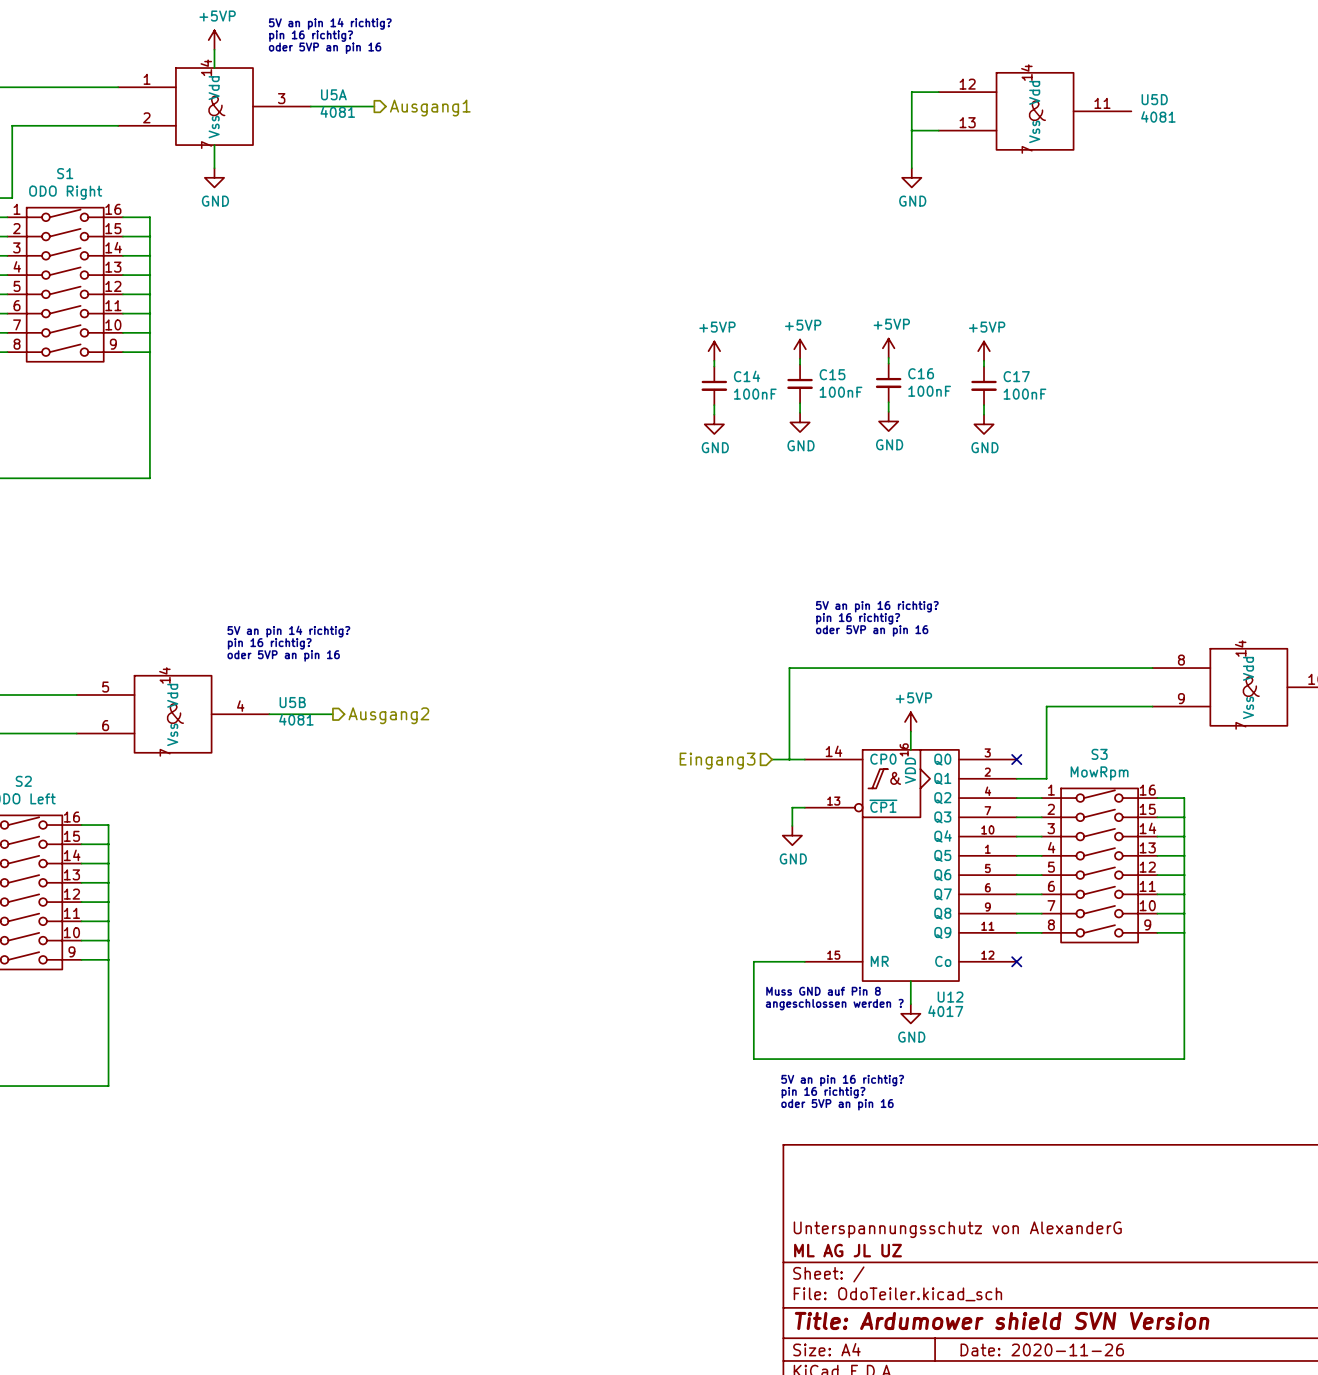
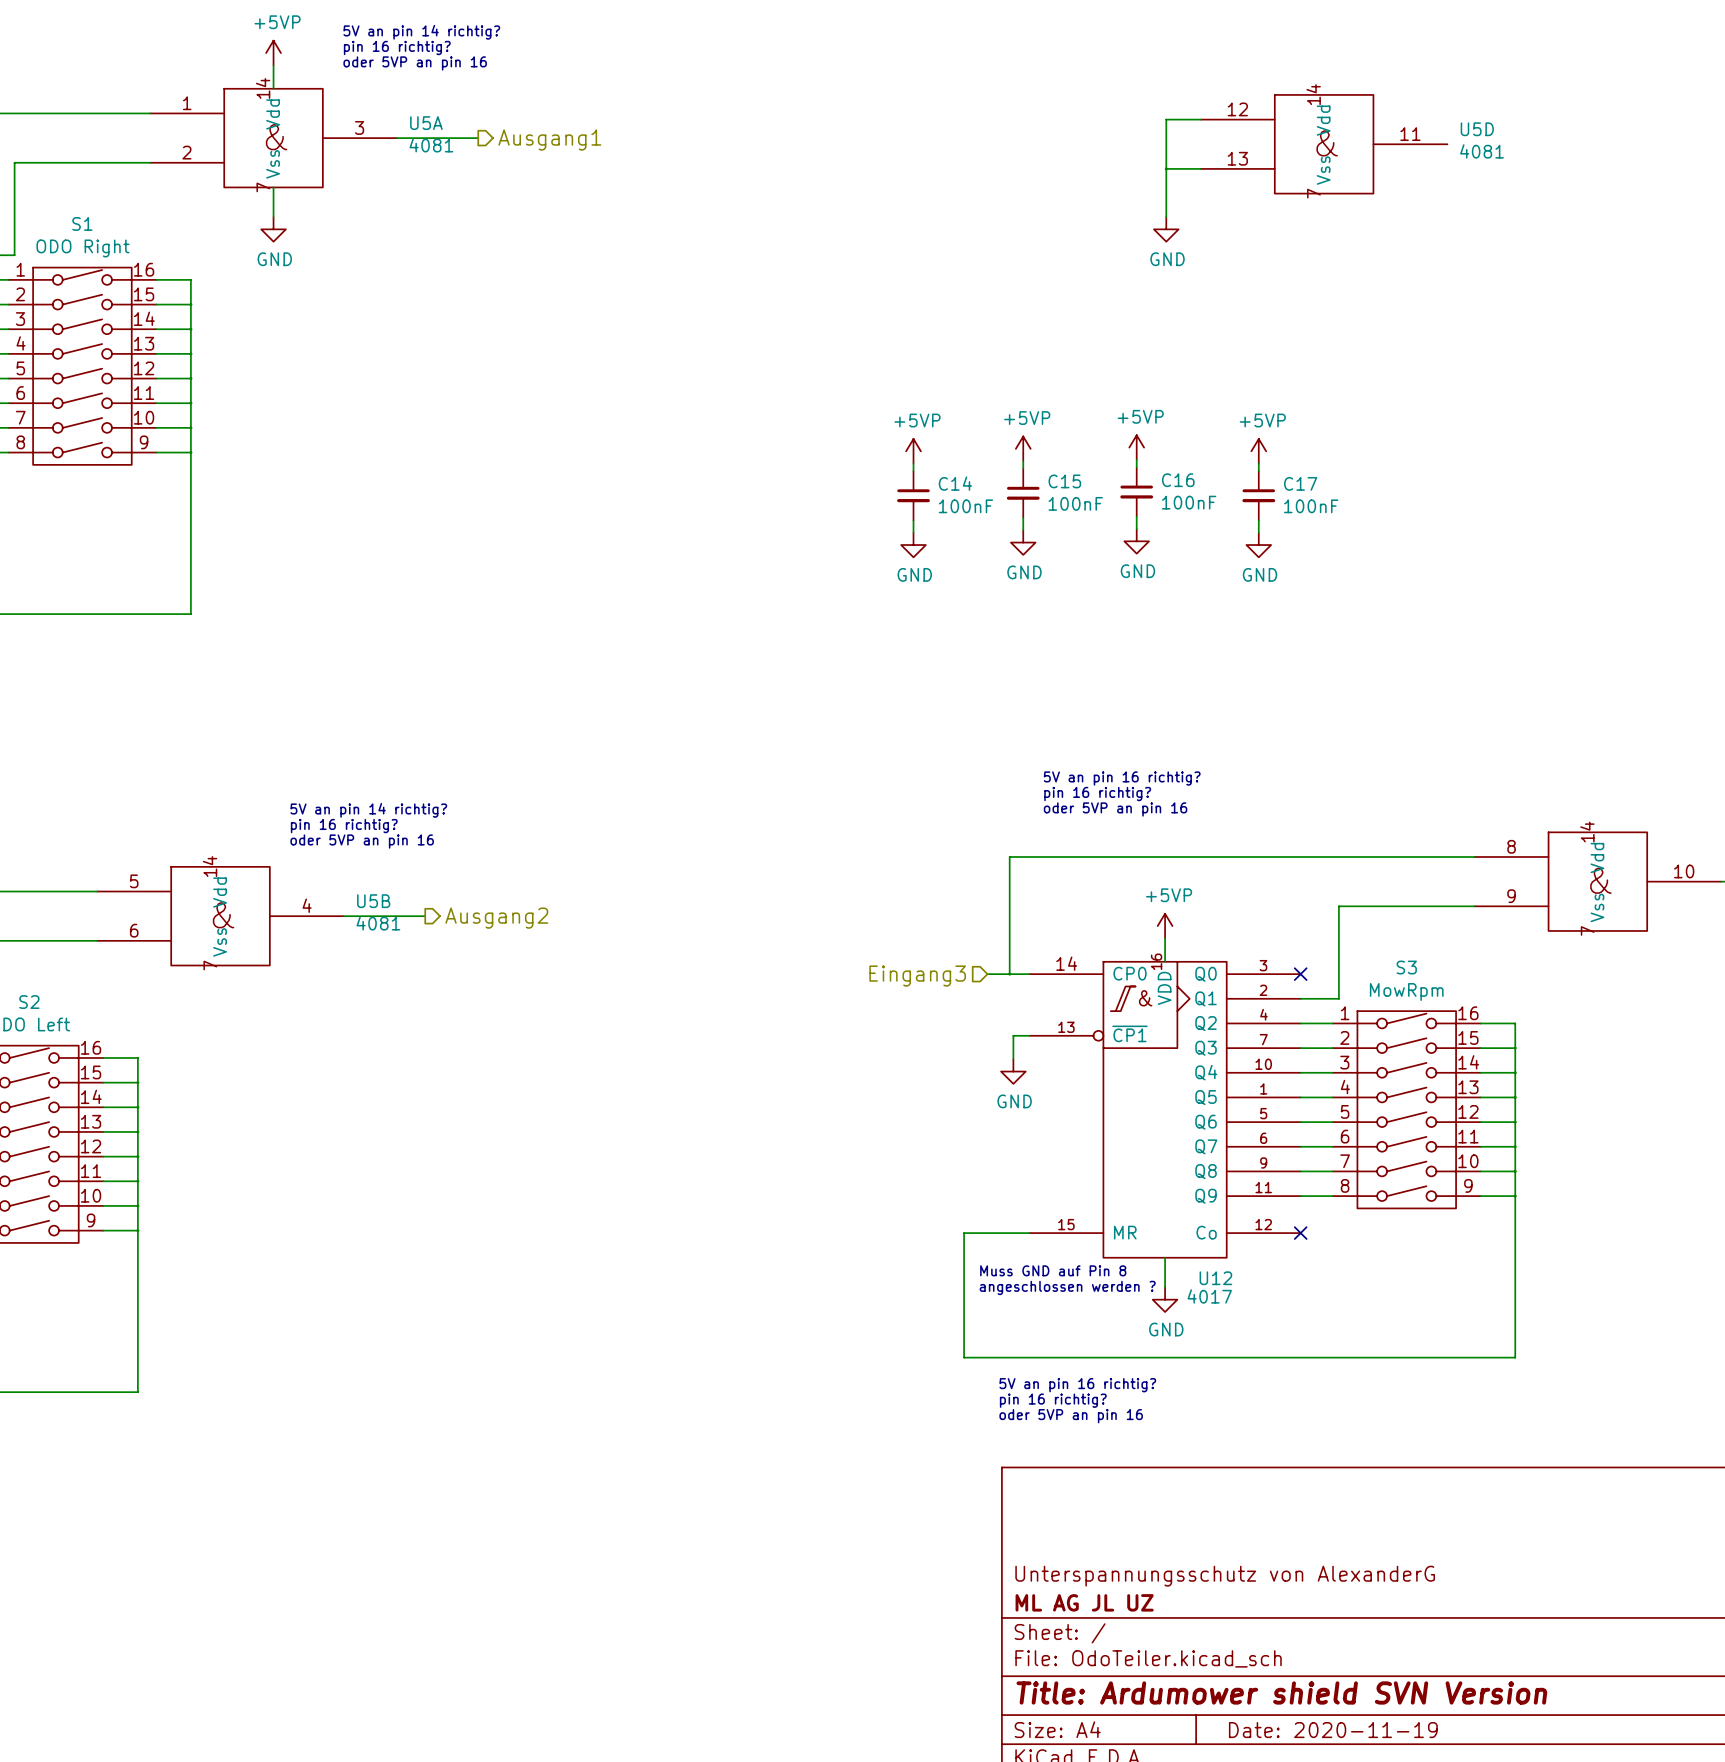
title block: Date: 2020-11-26 (1042, 1349) -> Date: 2020-11-19 (1333, 1730)

